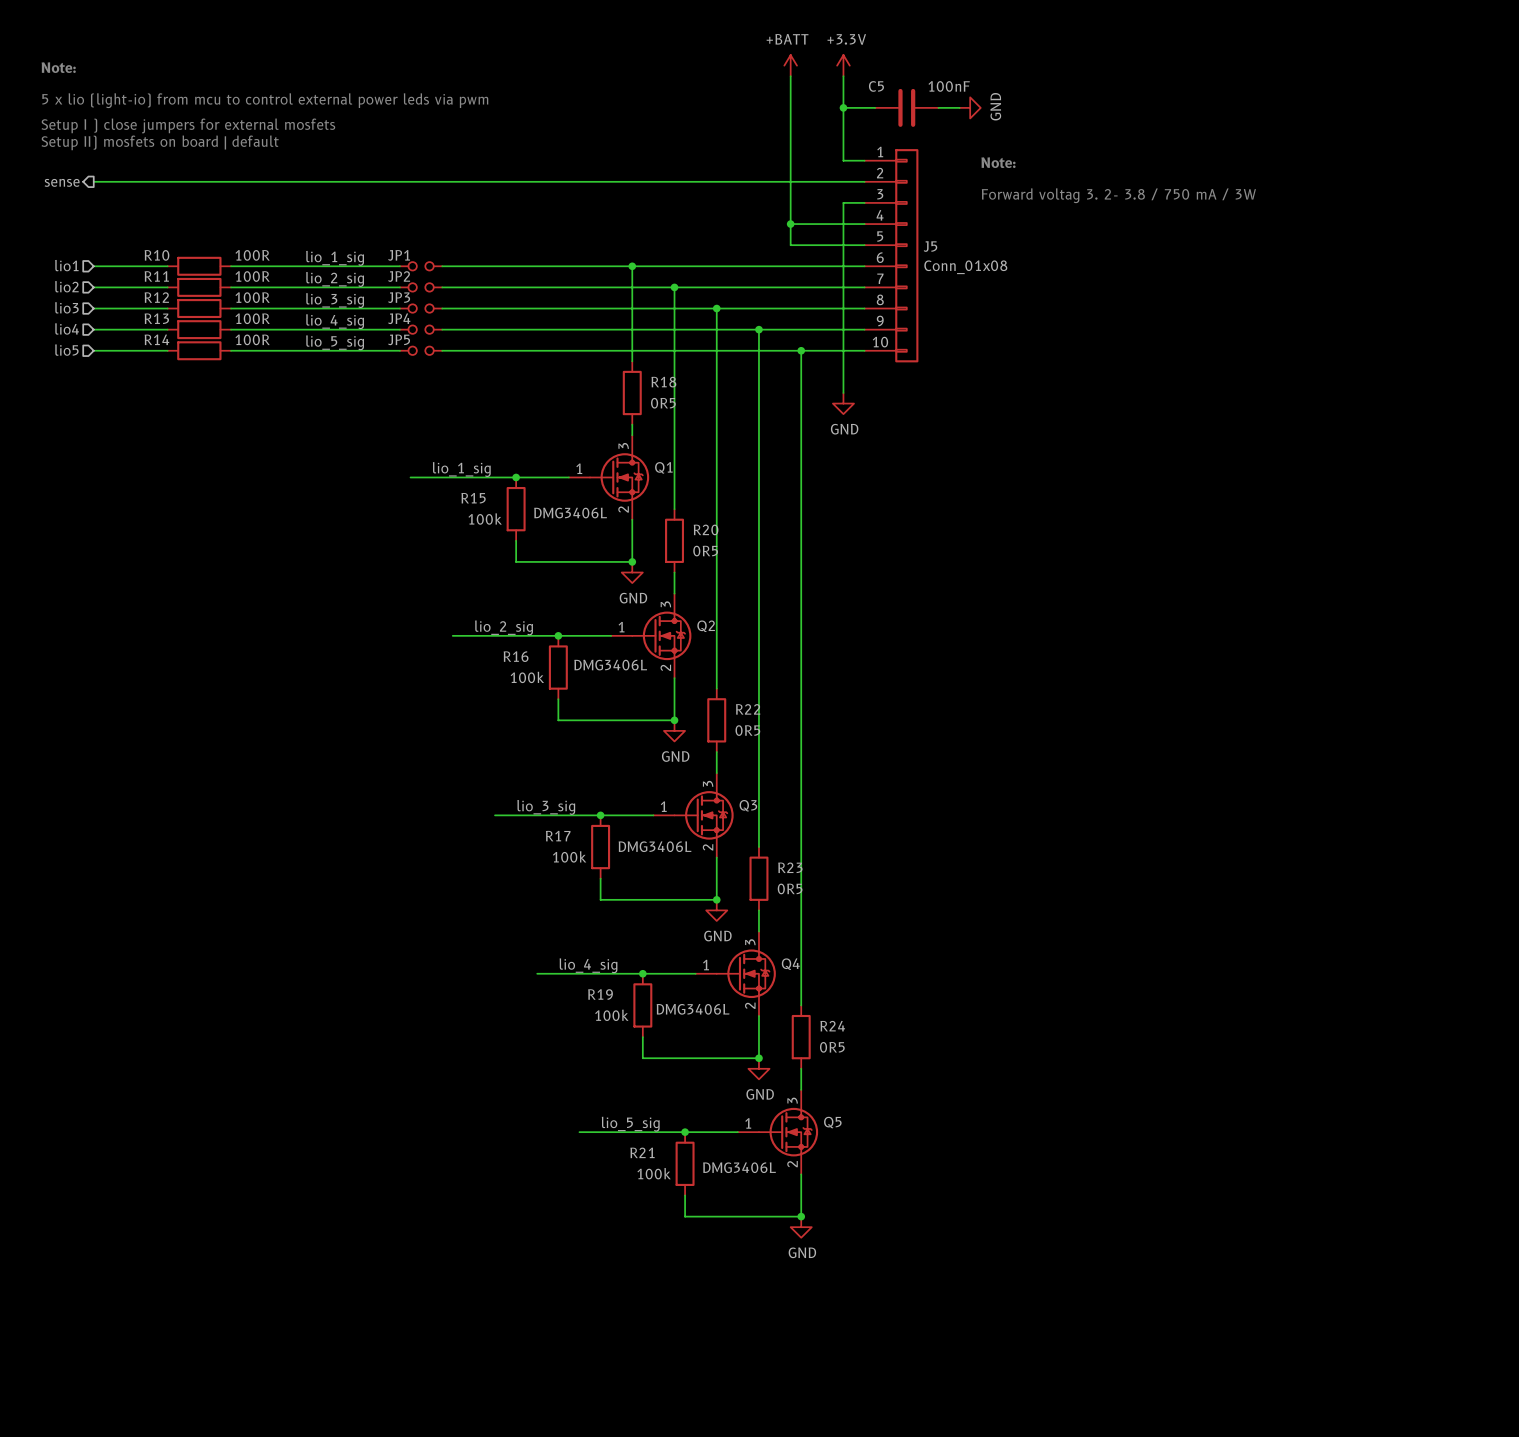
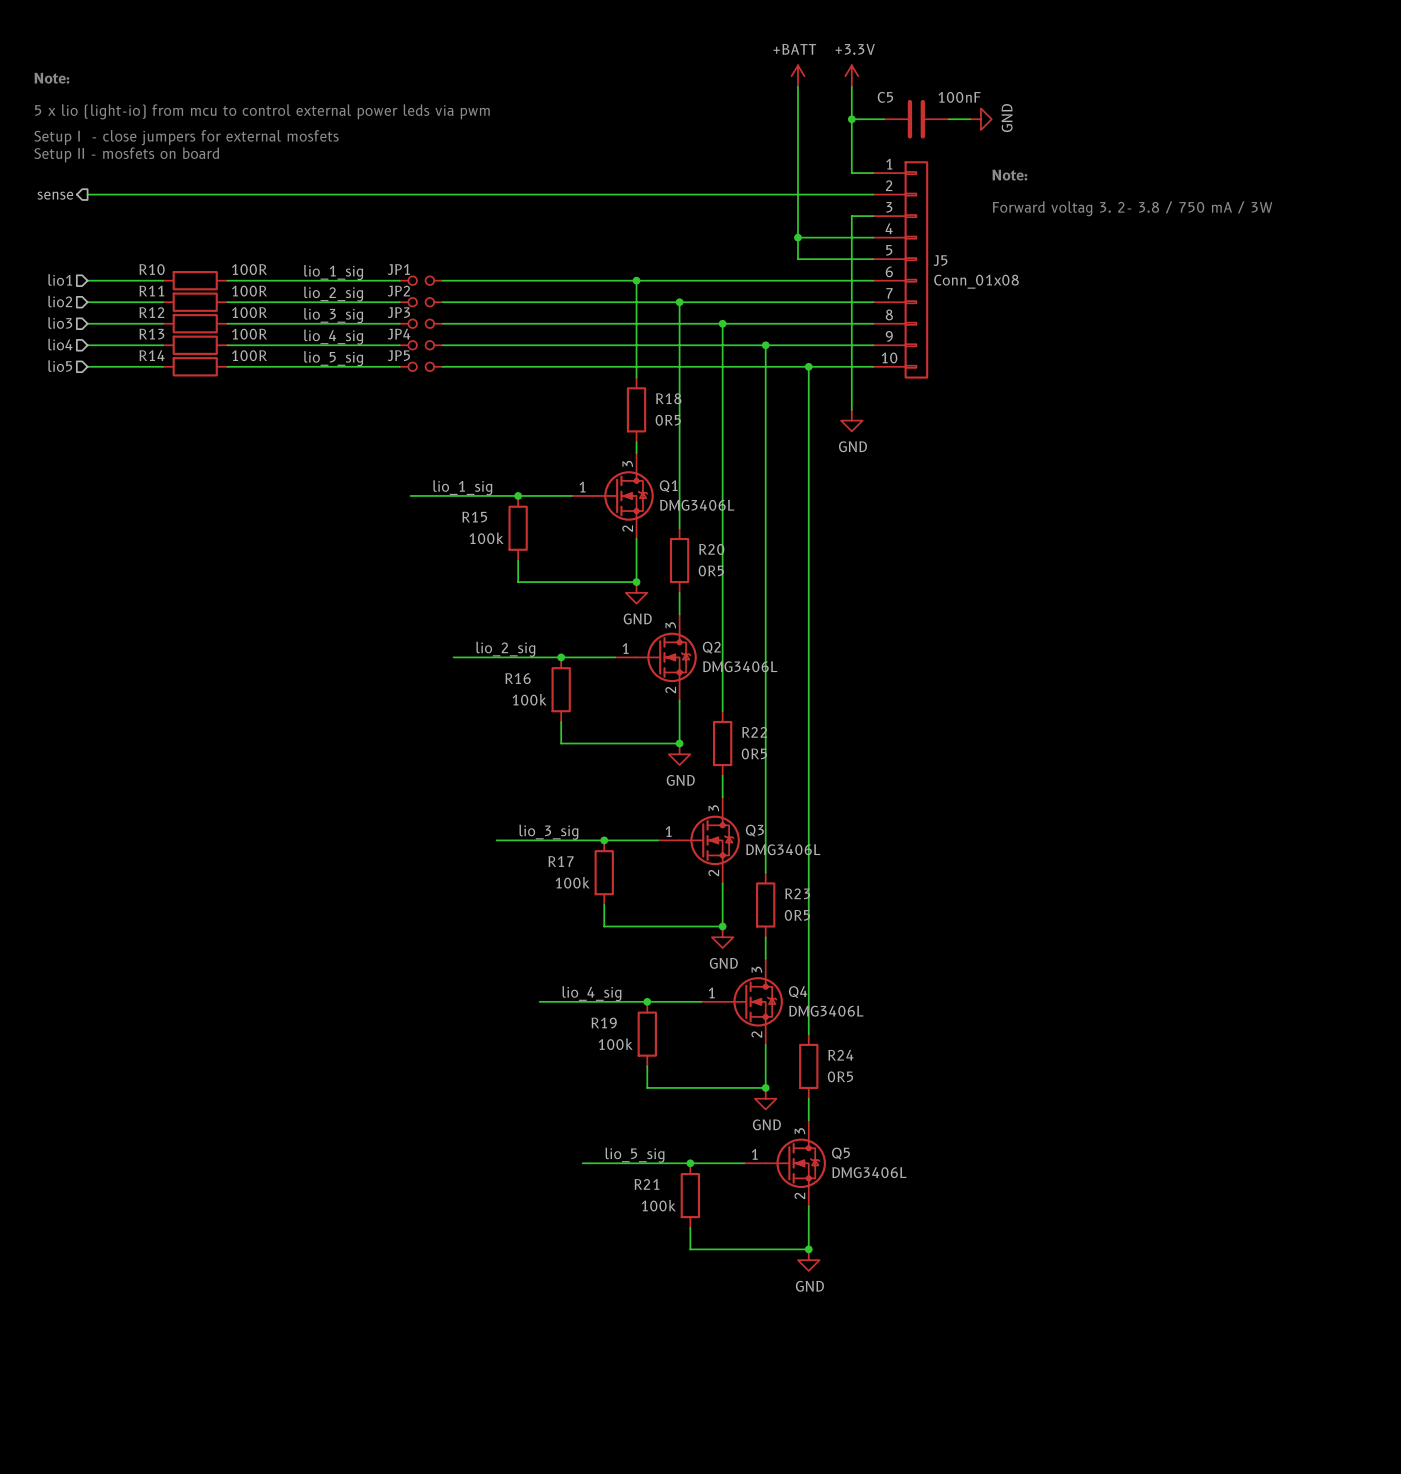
text: Setup I ) close jumpers for external mosfets (188, 125) -> Setup I - close jumpers for external mosfets (186, 137)
text: Setup II) mosfets on board | default (160, 142) -> Setup II - mosfets on board (126, 154)
Q1 value position: DMG3406L (570, 513) -> DMG3406L (697, 505)
Q2 value position: DMG3406L (610, 665) -> DMG3406L (740, 666)
Q3 value position: DMG3406L (655, 846) -> DMG3406L (783, 849)
Q4 value position: DMG3406L (693, 1009) -> DMG3406L (826, 1011)
Q5 value position: DMG3406L (739, 1167) -> DMG3406L (869, 1172)

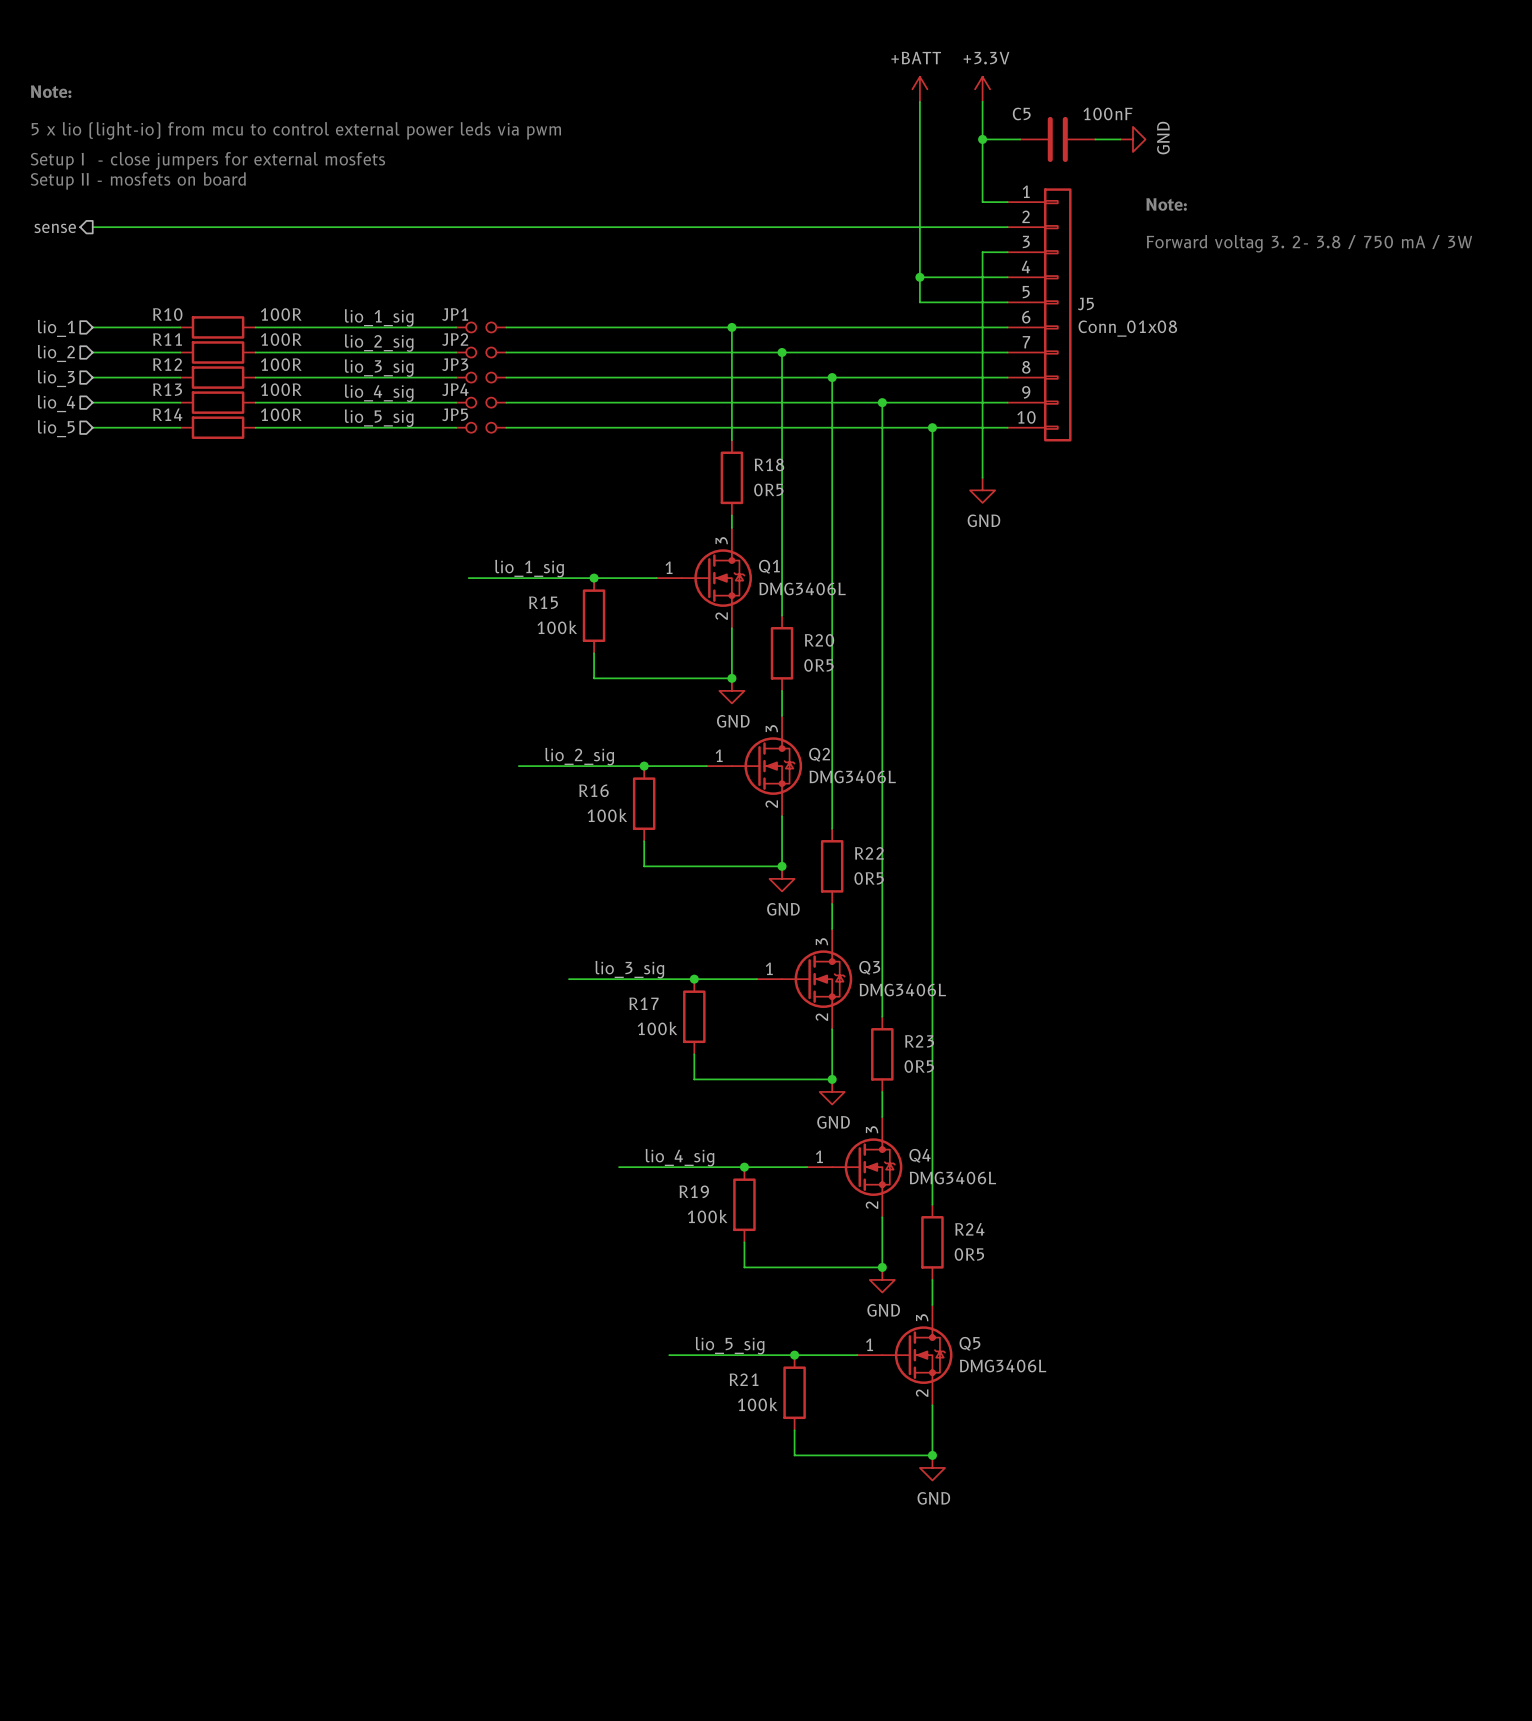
hierarchical label: lio1 (60, 279) -> lio_1 (56, 328)
hierarchical label: lio2 (60, 301) -> lio_2 (56, 353)
hierarchical label: lio3 (60, 323) -> lio_3 (56, 378)
hierarchical label: lio4 (60, 344) -> lio_4 (56, 403)
hierarchical label: lio5 (60, 366) -> lio_5 (56, 428)

